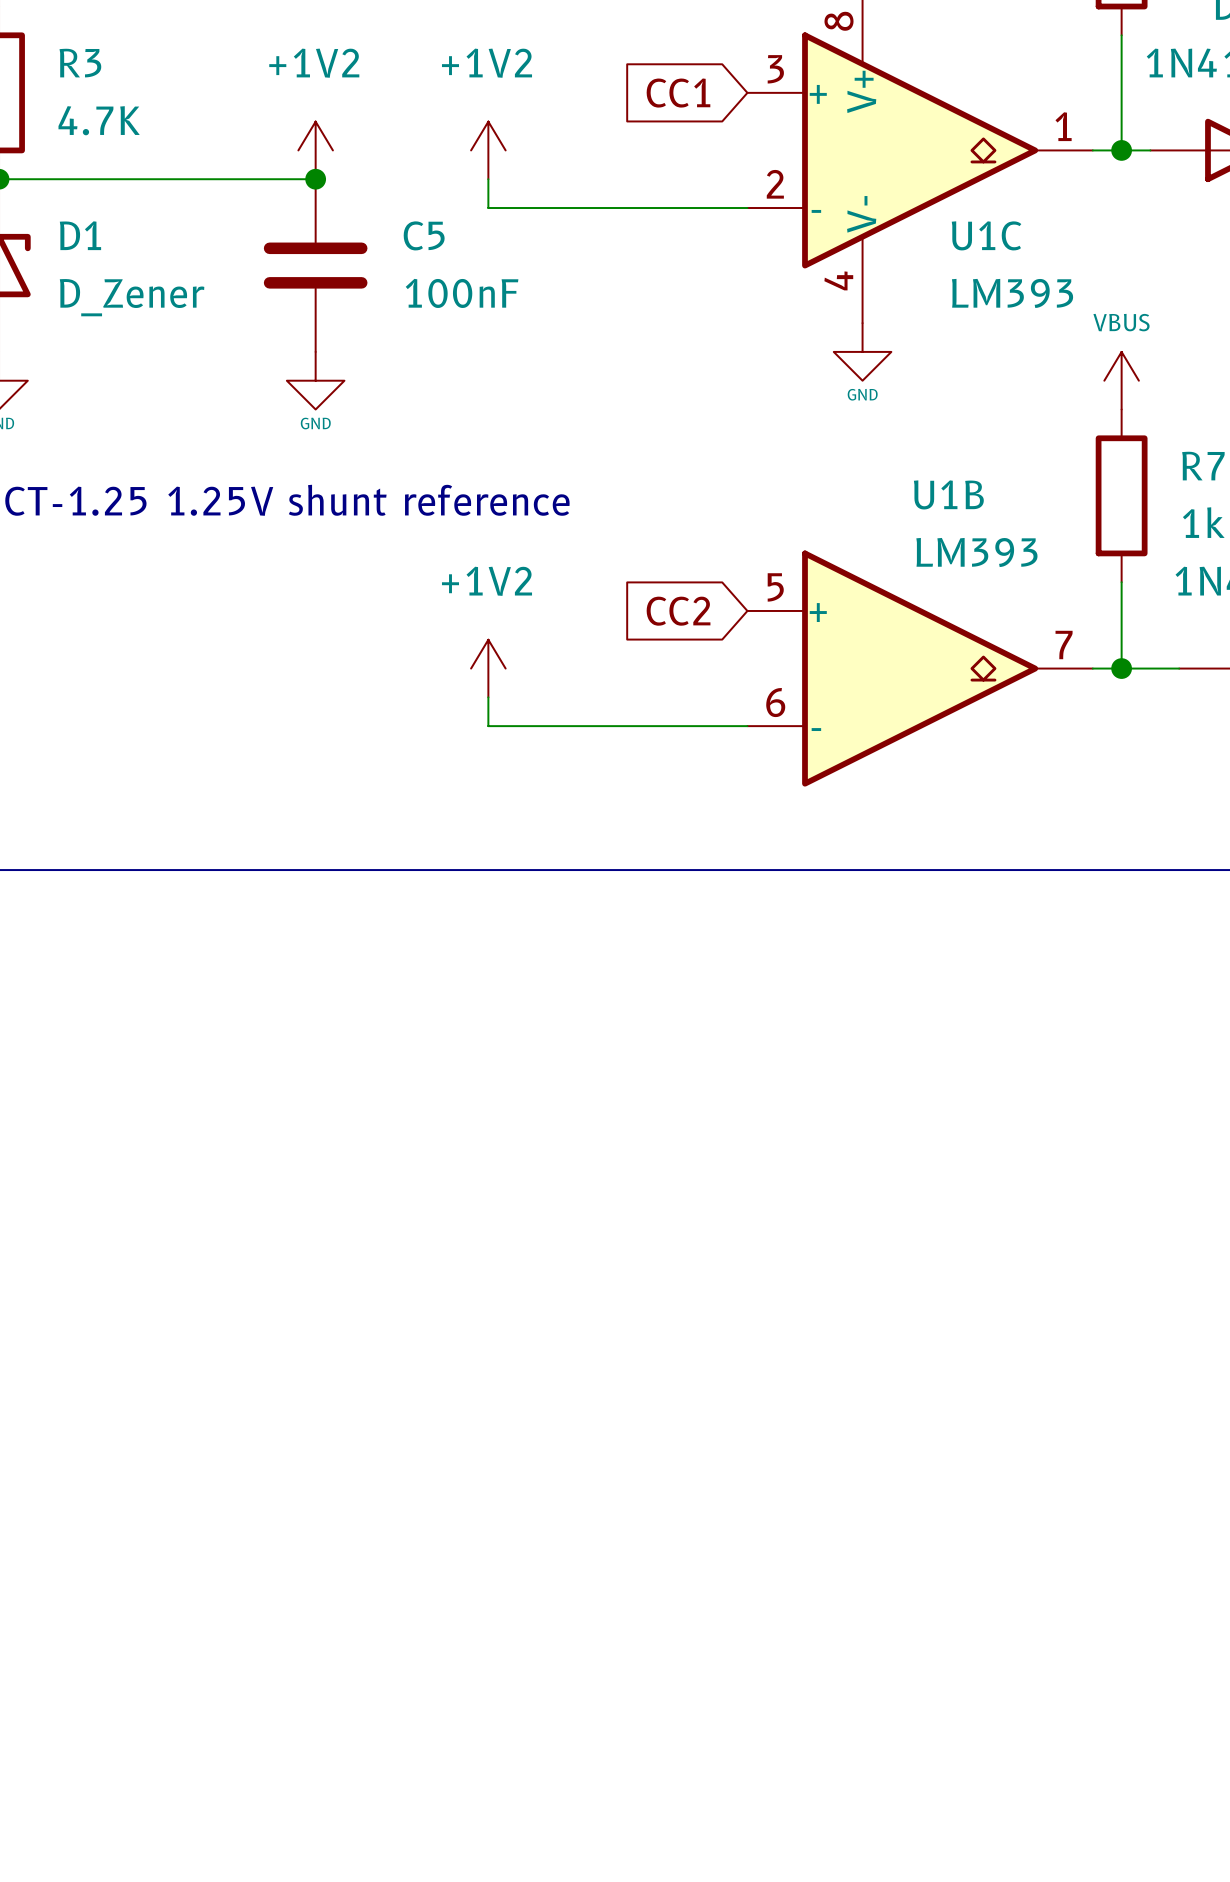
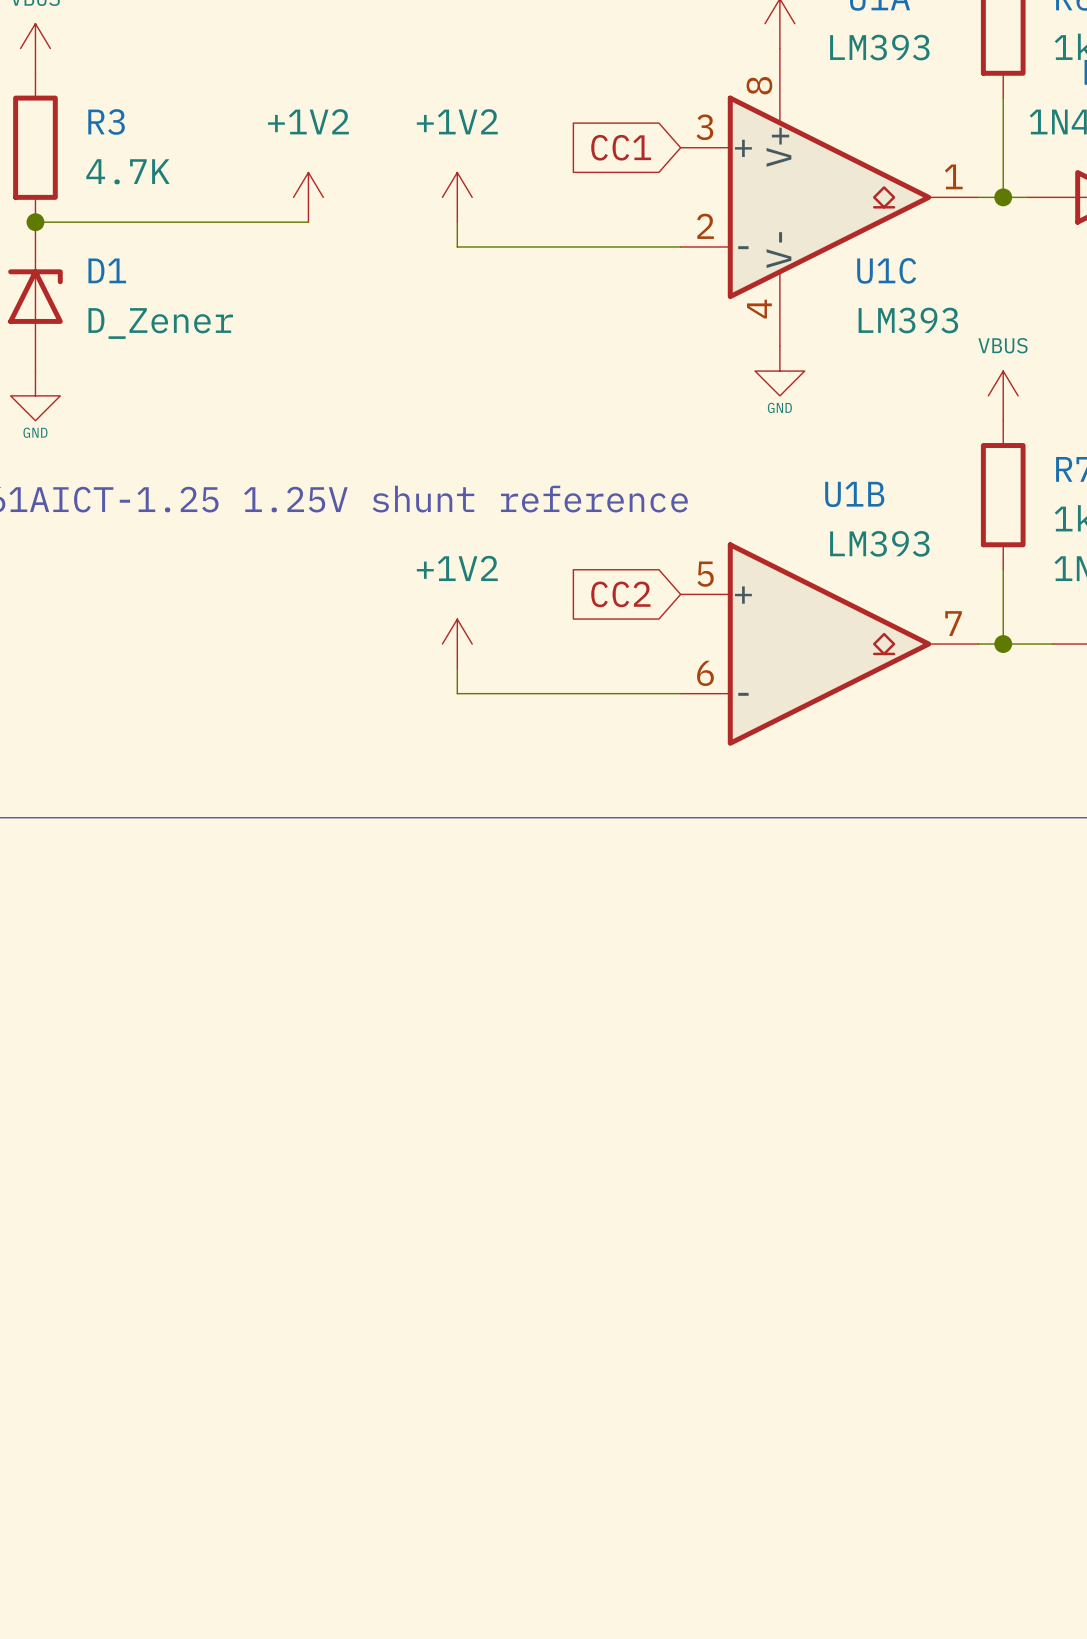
junction: (315, 179) -> none
C5: 100nF (315, 265) -> none
power symbol: GND (315, 380) -> none

